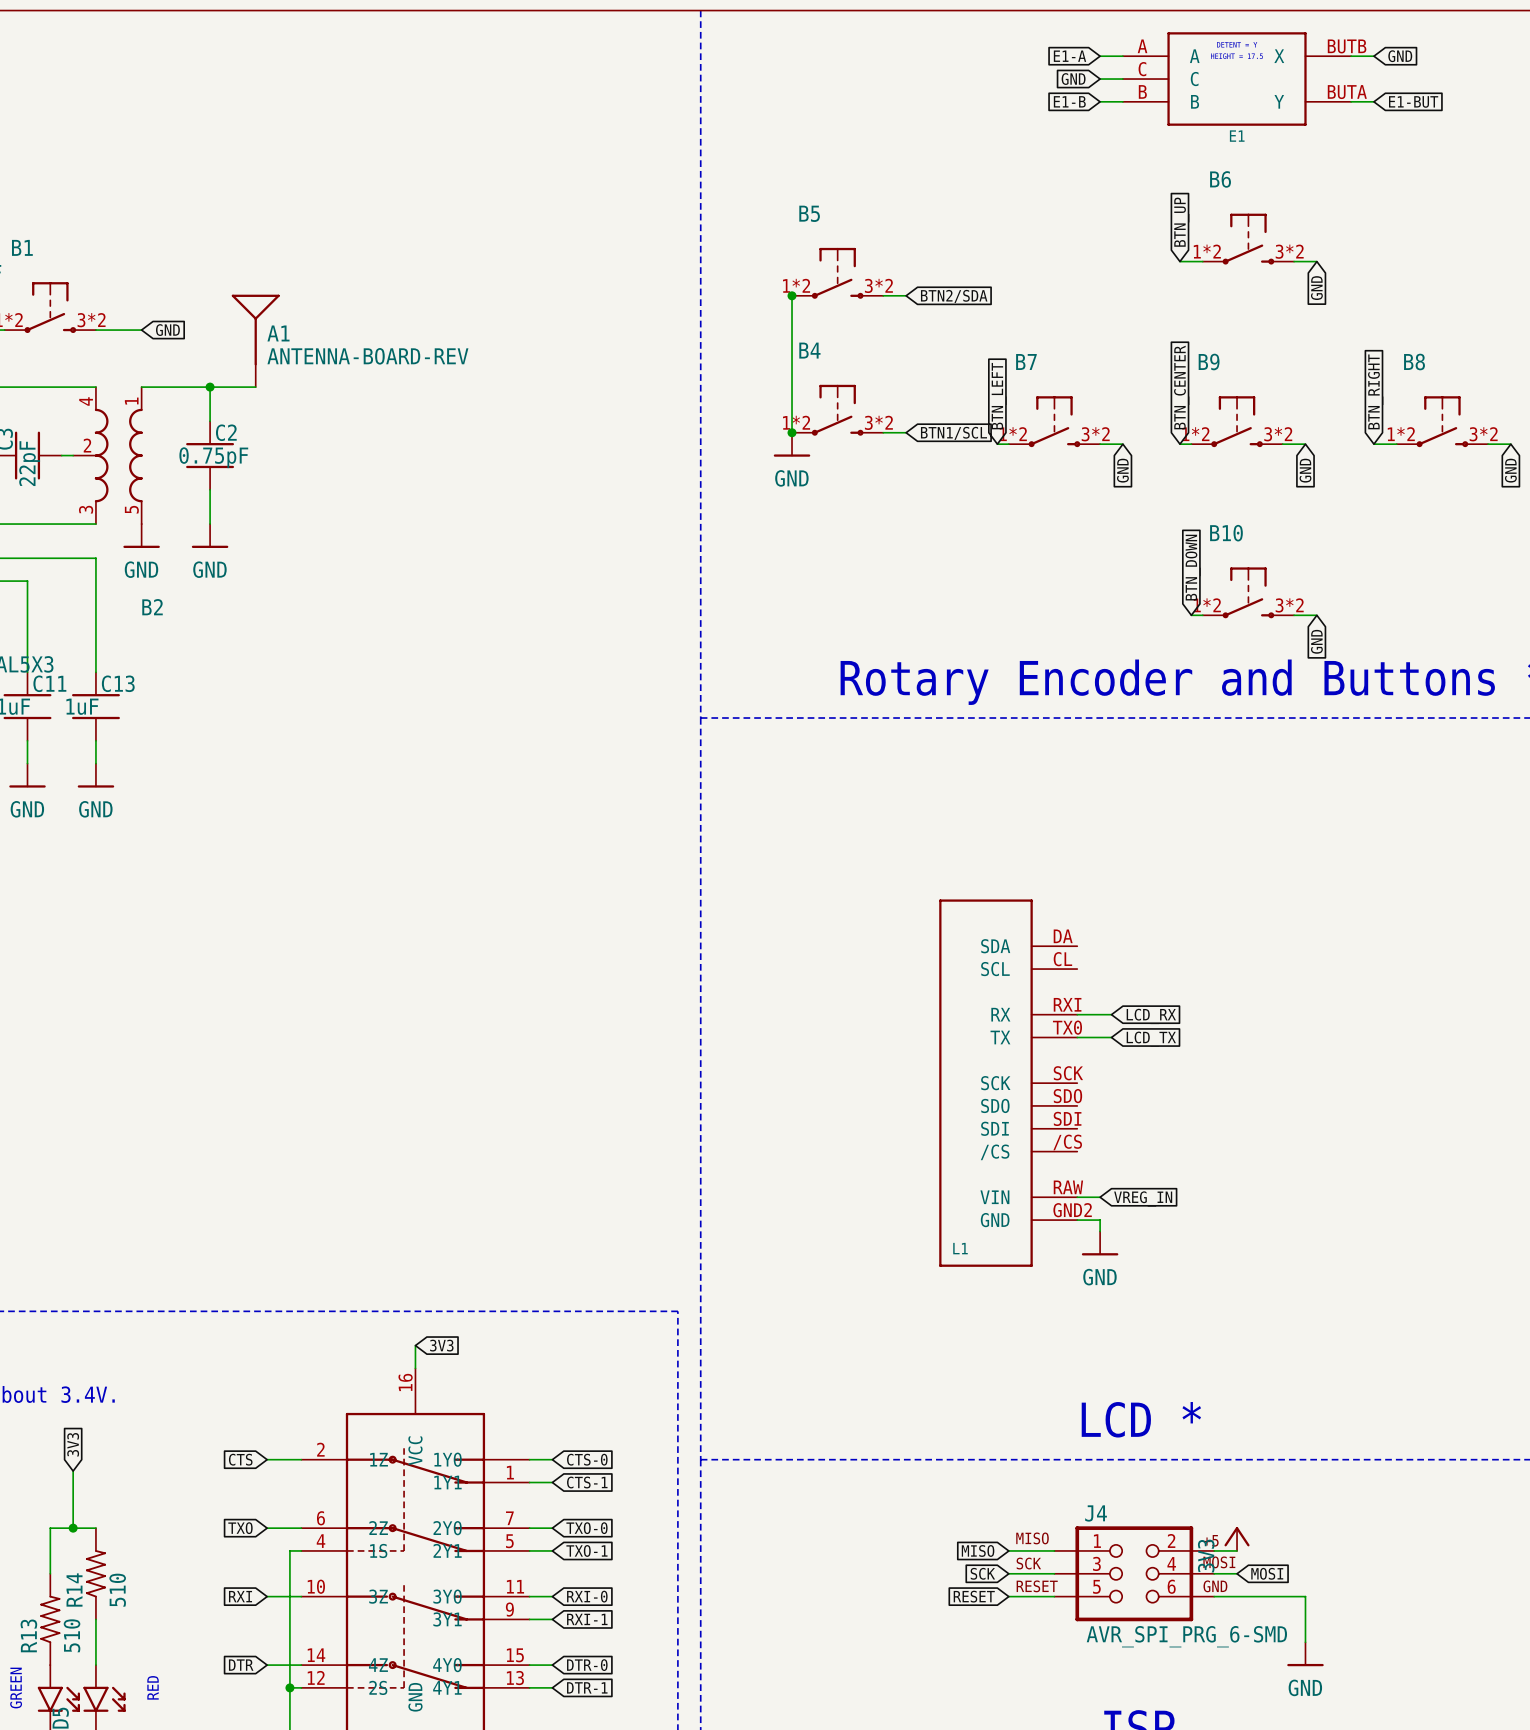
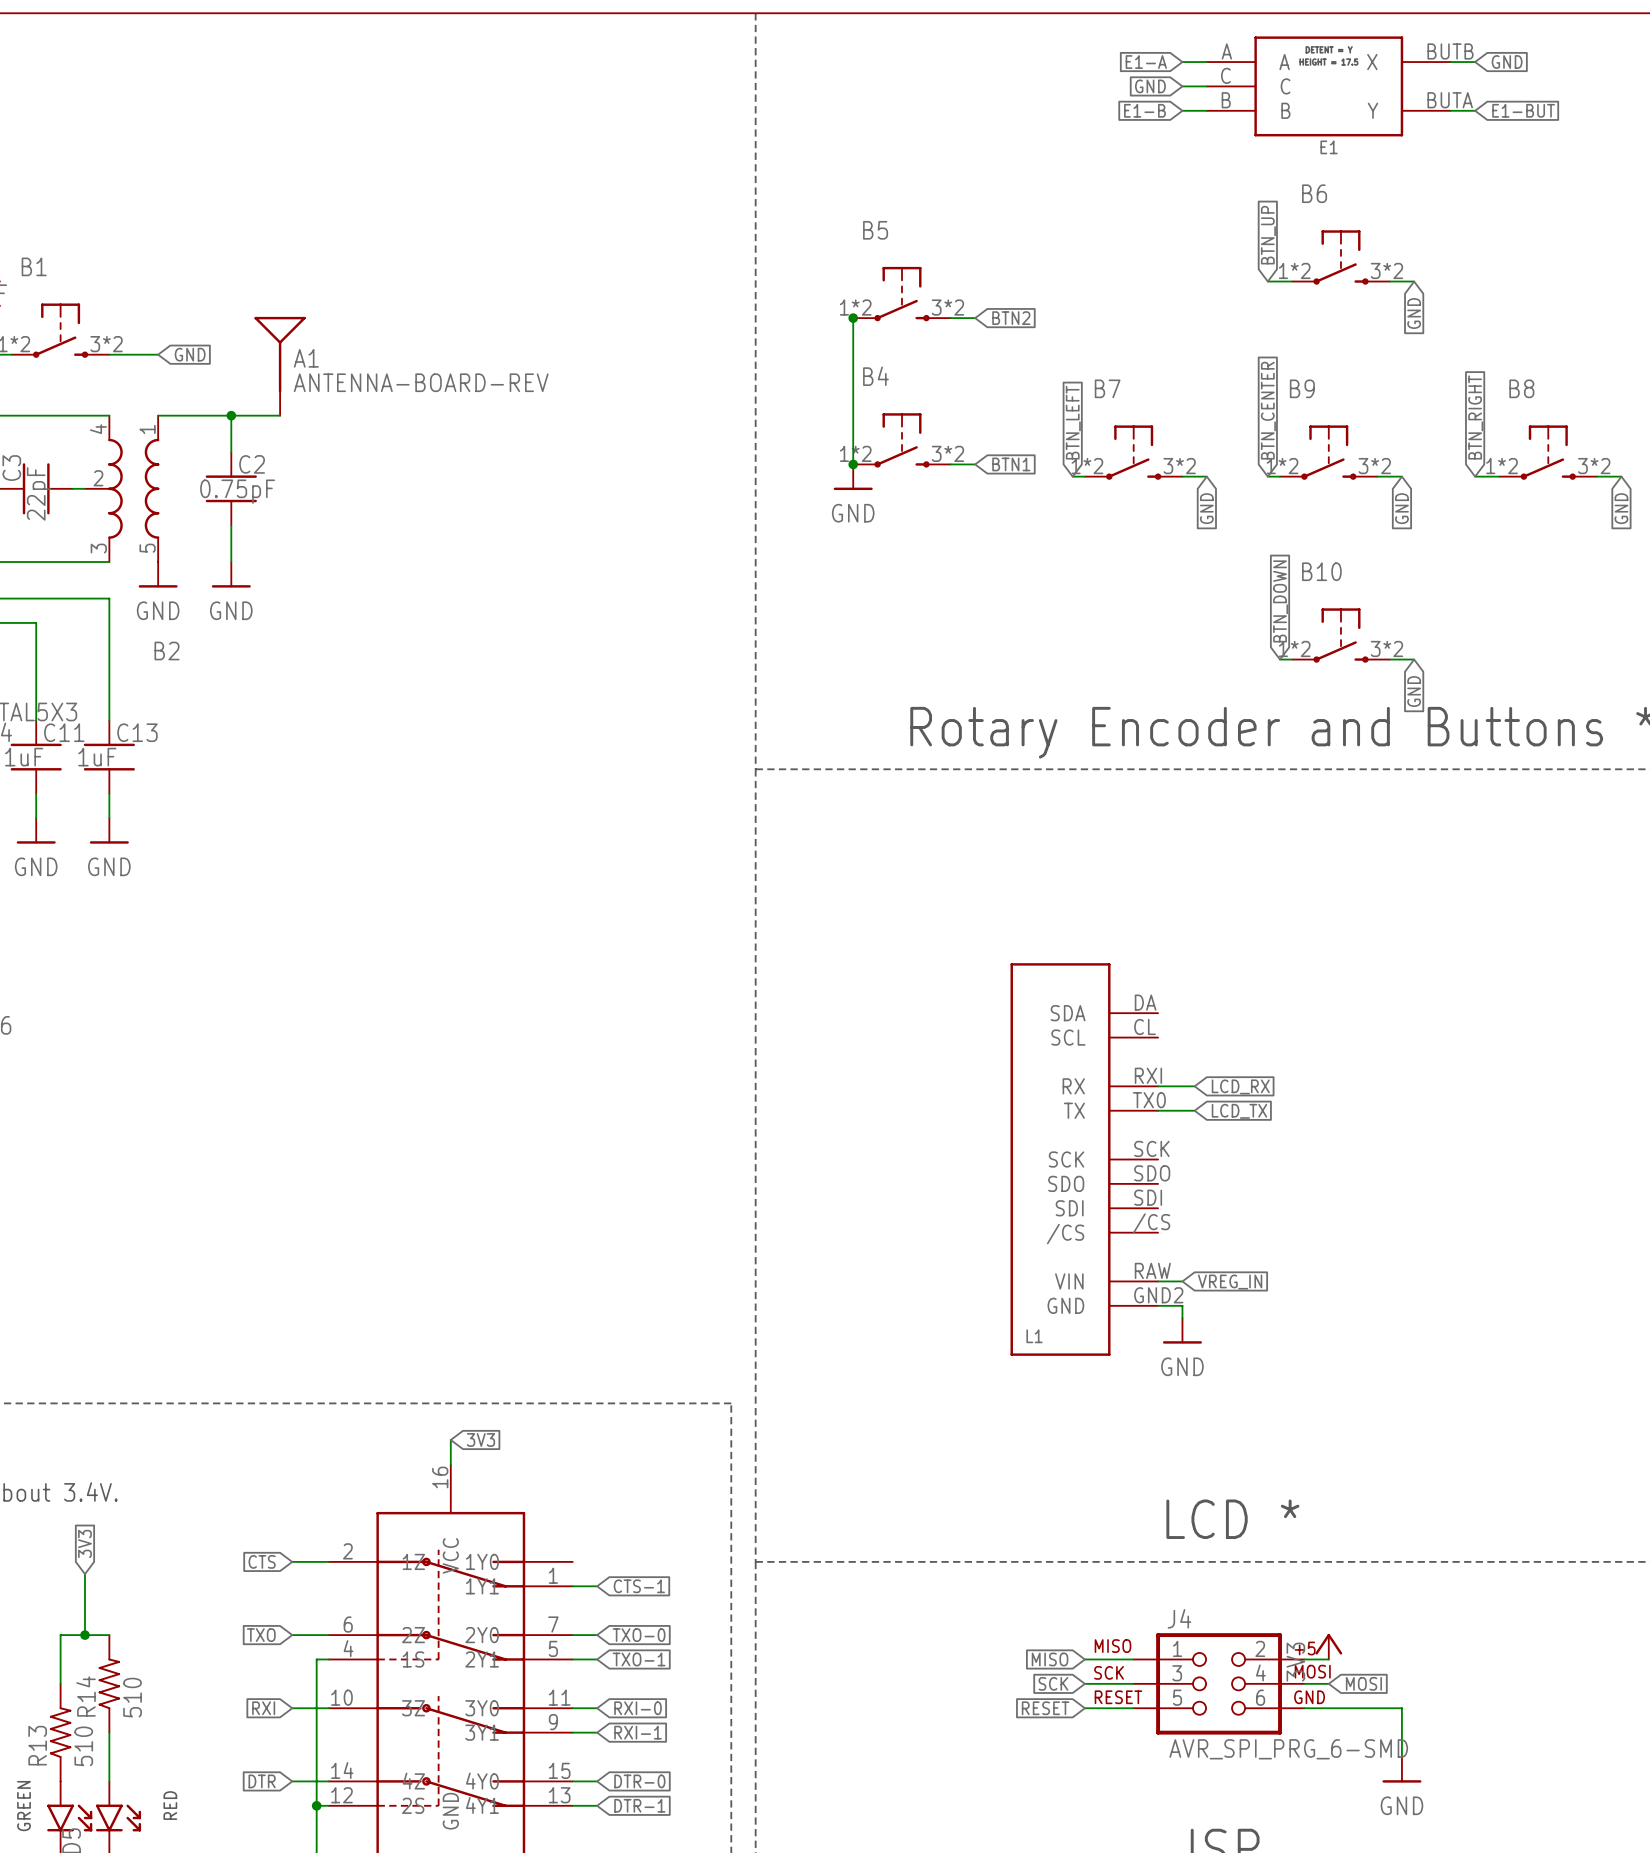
global label: BTN2/SDA (954, 296) -> BTN2 (1011, 318)
global label: BTN1/SCL (953, 433) -> BTN1 (1011, 464)
wire: (529, 1459) (552, 1459) -> none
global label: CTS-0 (587, 1459) -> none

